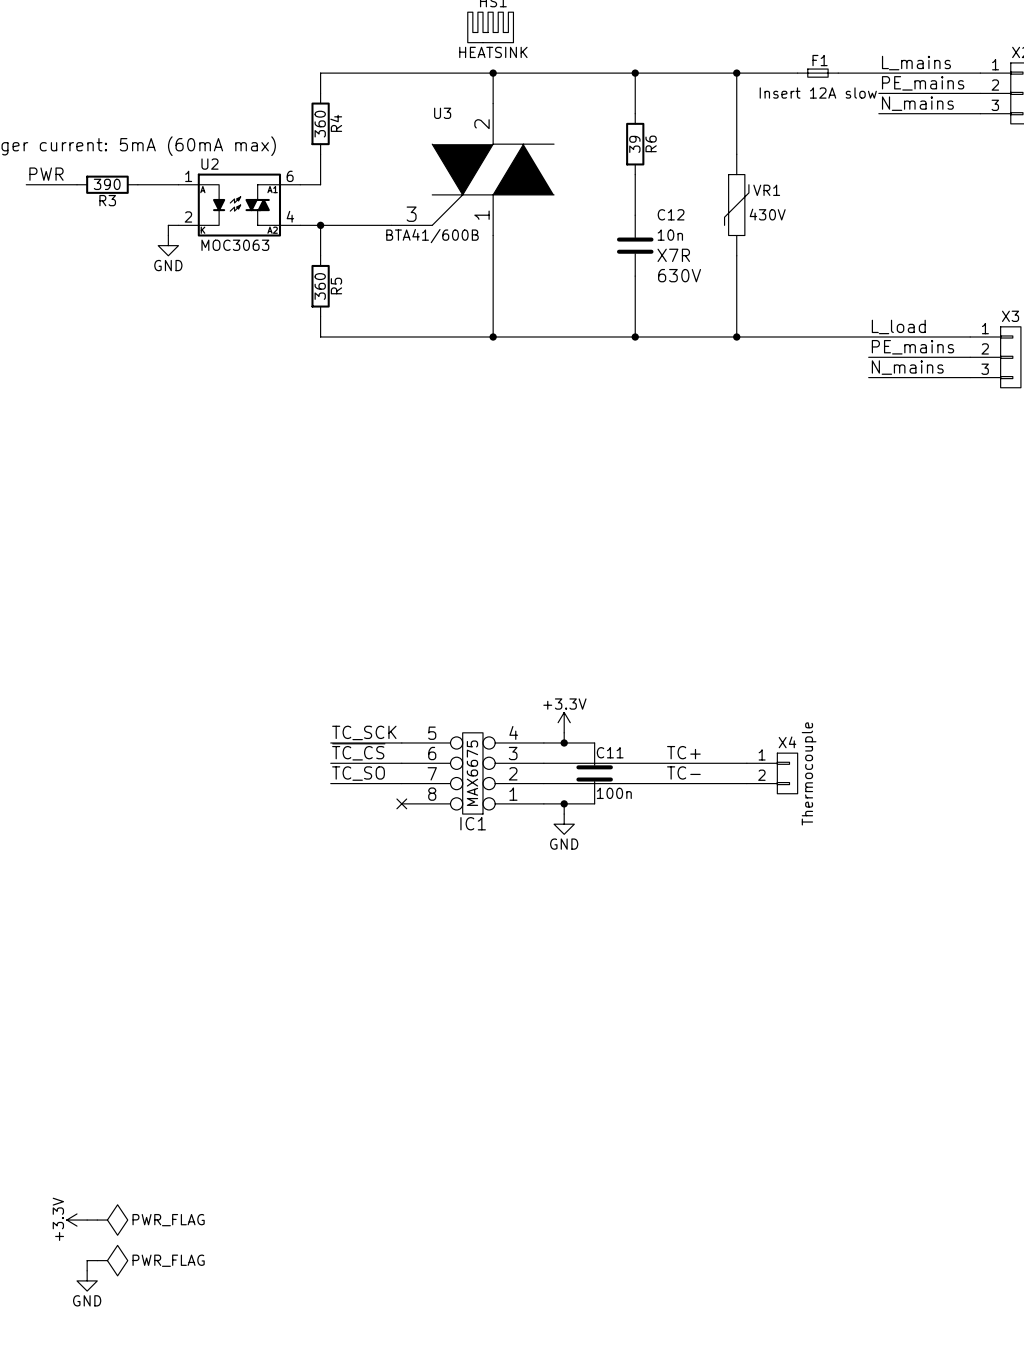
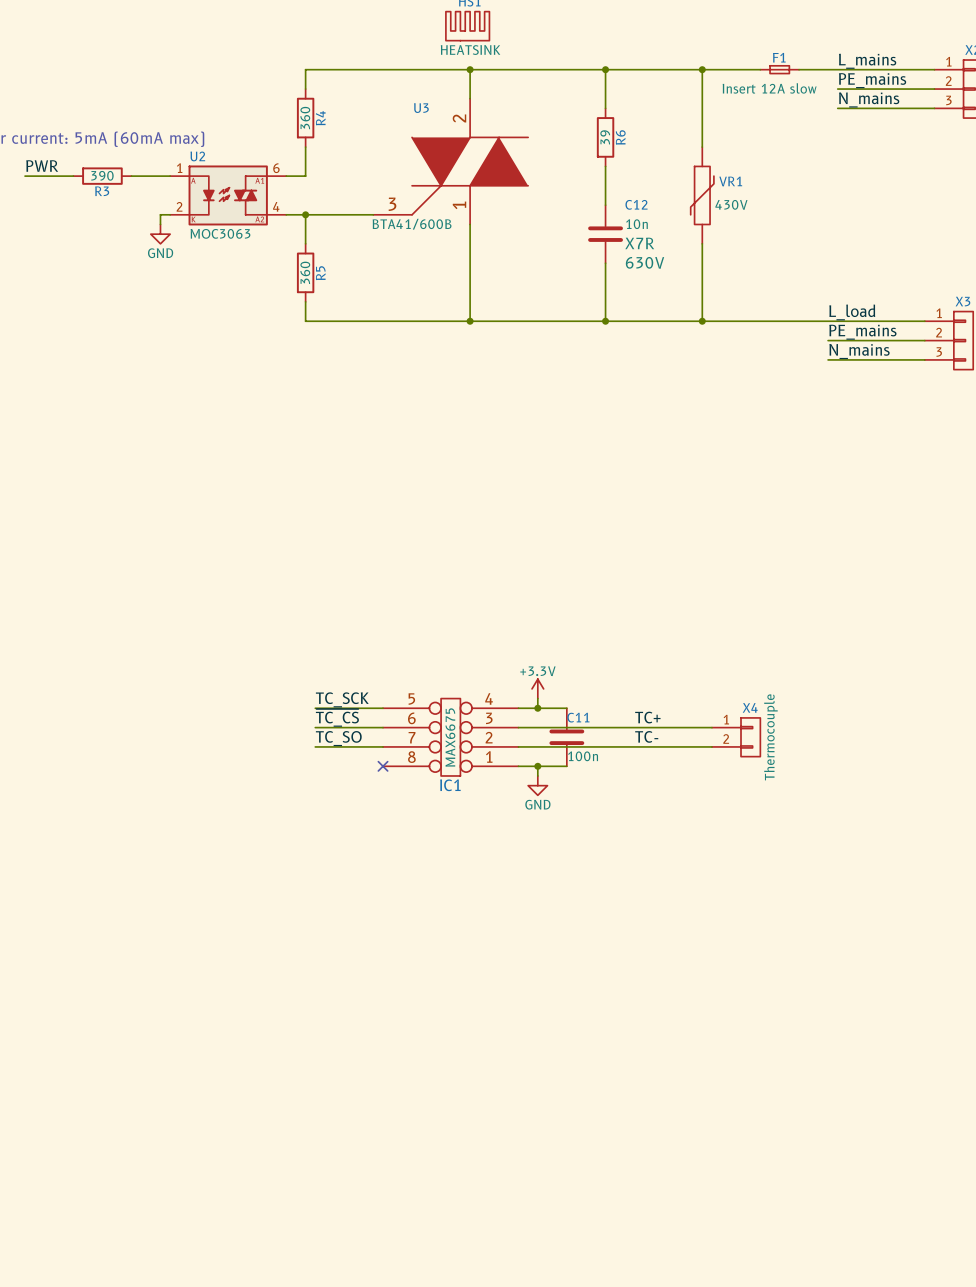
power symbol: +3.3V (77, 1220) -> none
wire: (87, 1220) (97, 1220) -> none
power symbol: PWR_FLAG (112, 1220) -> none
wire: (97, 1260) (87, 1260) (87, 1270) -> none
power symbol: PWR_FLAG (112, 1260) -> none
power symbol: GND (87, 1280) -> none

